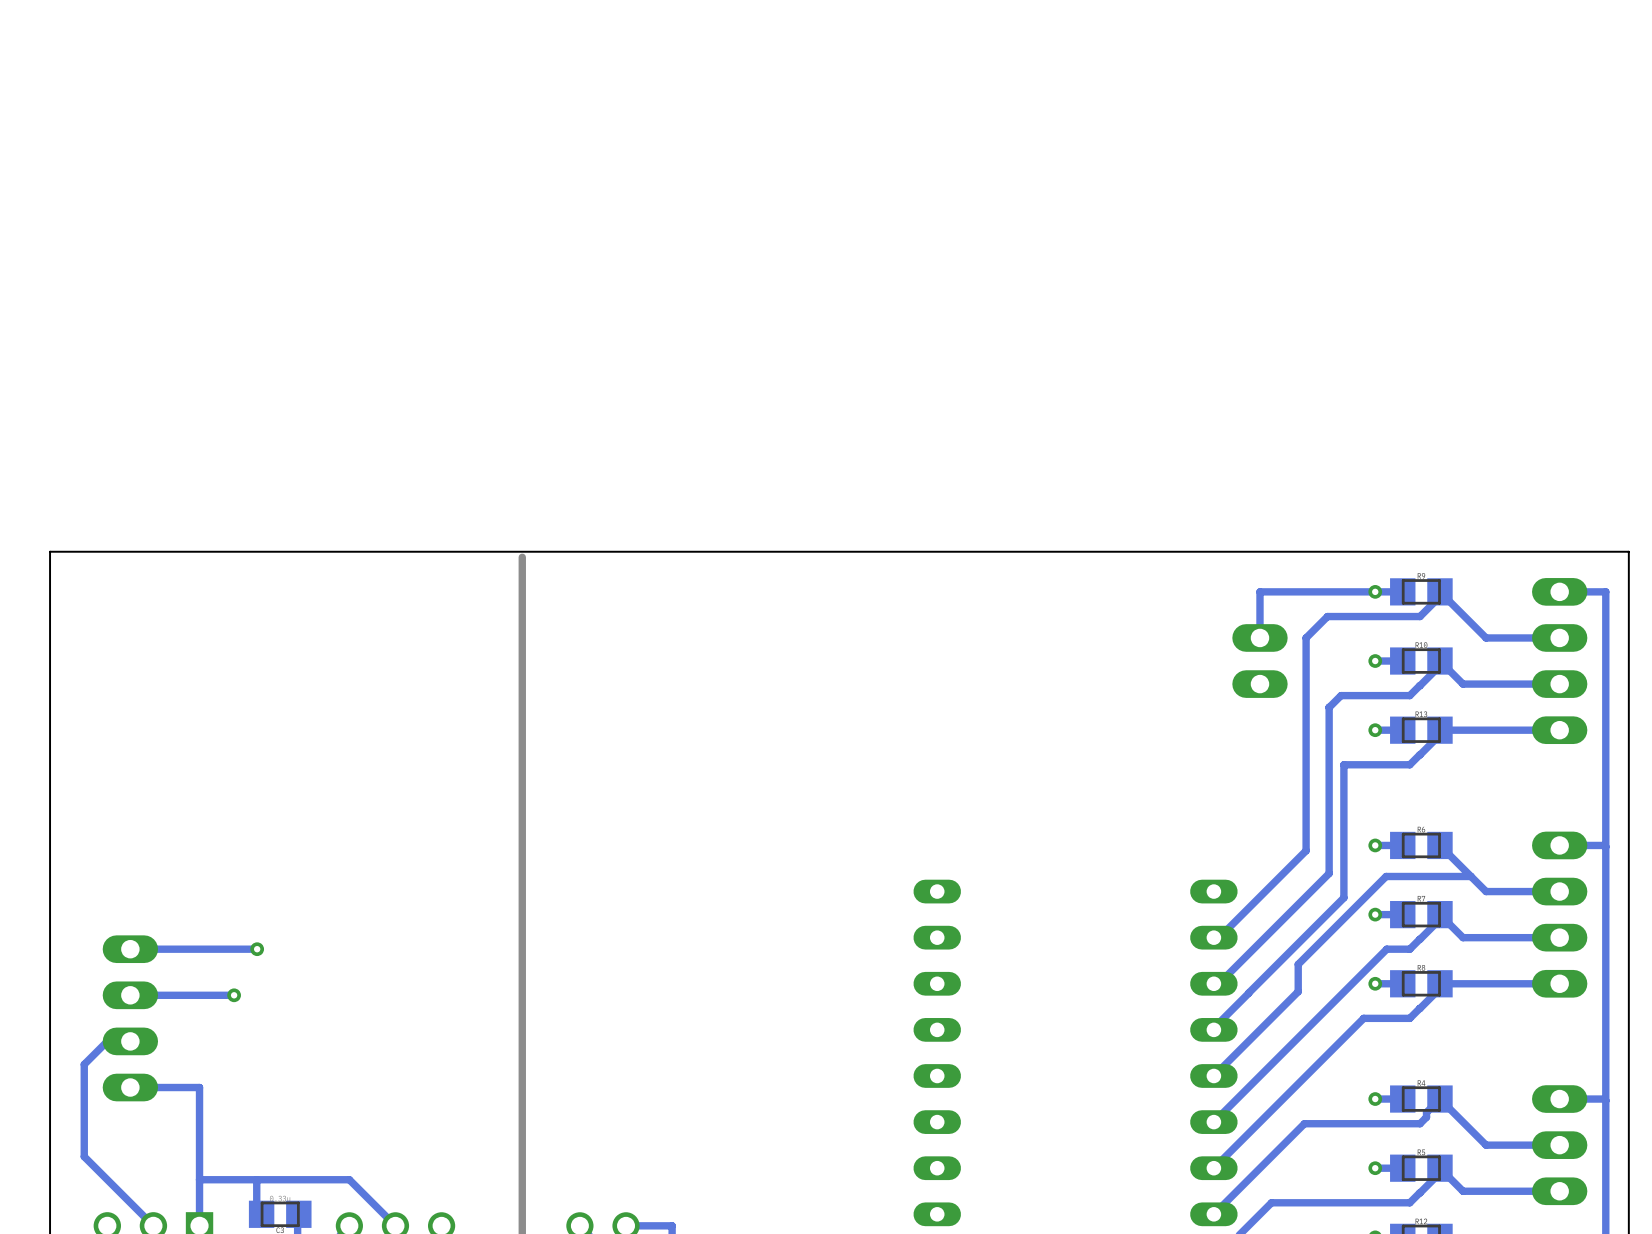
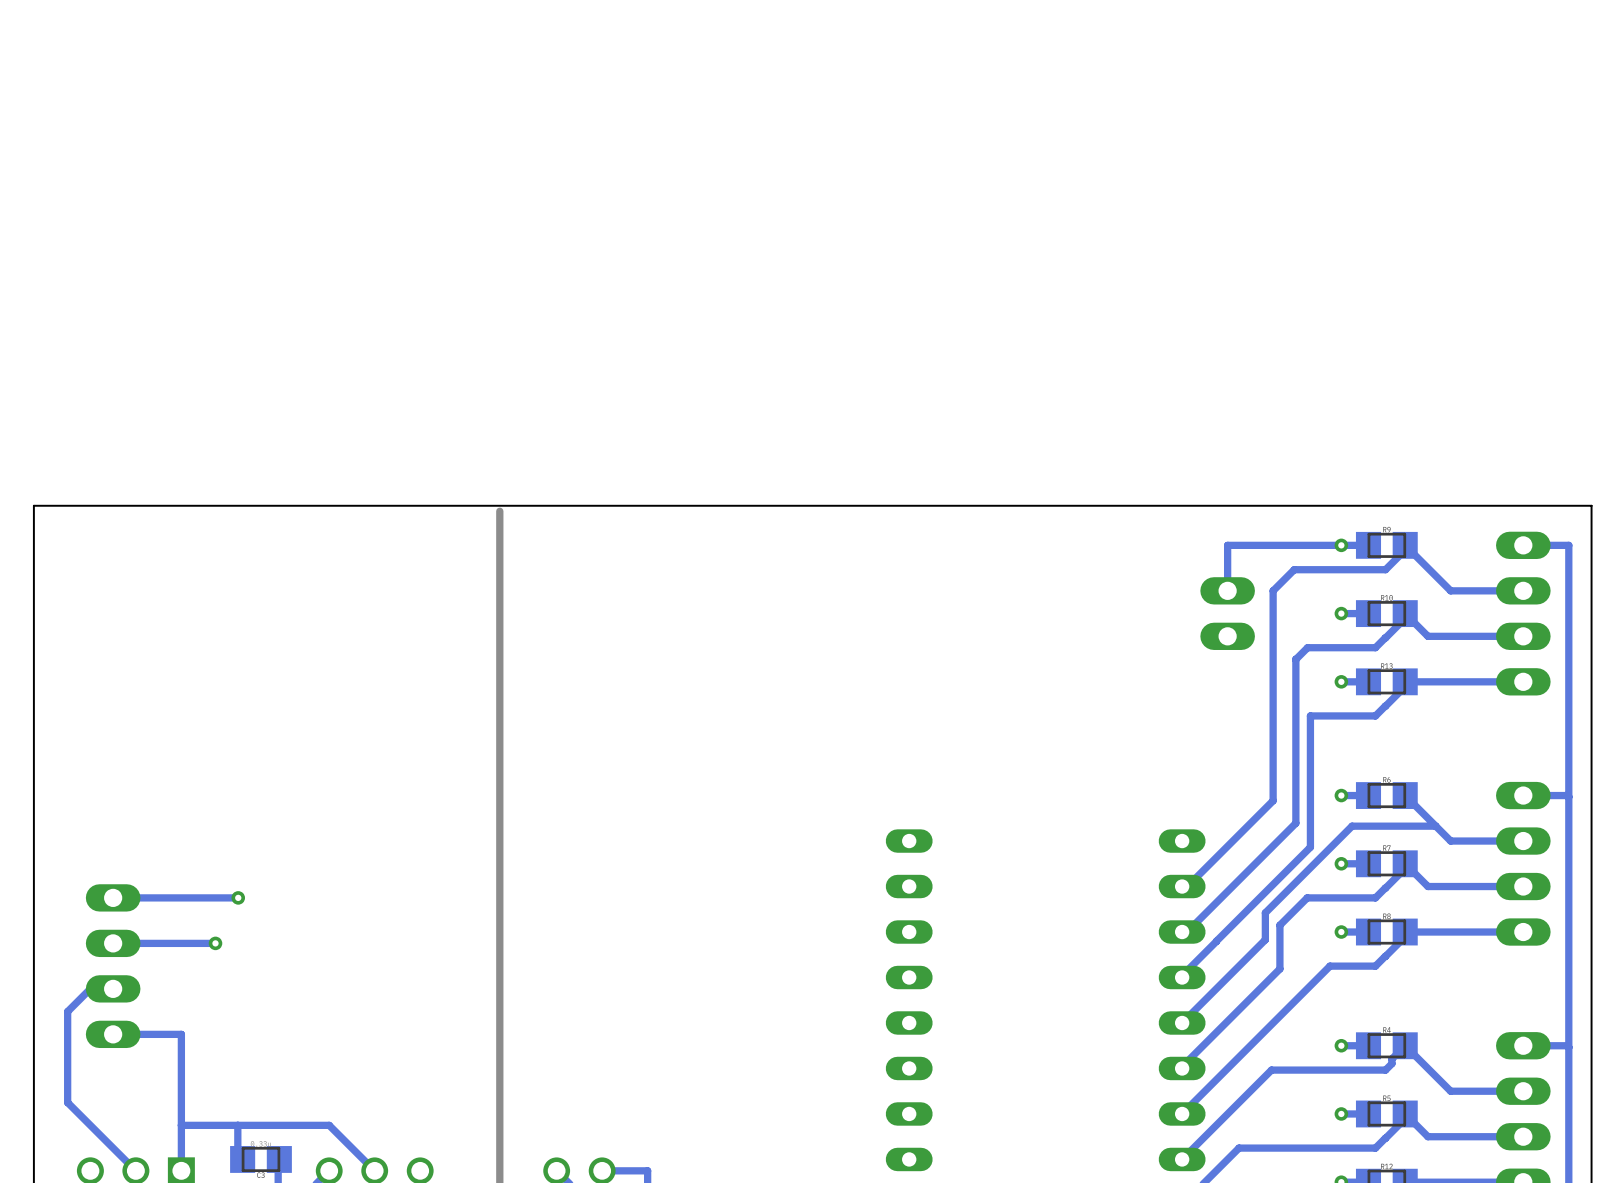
track: (1386, 949) (1213, 1122) -> (1352, 897) (1307, 897) (1279, 925) (1279, 968) (1182, 1068)

